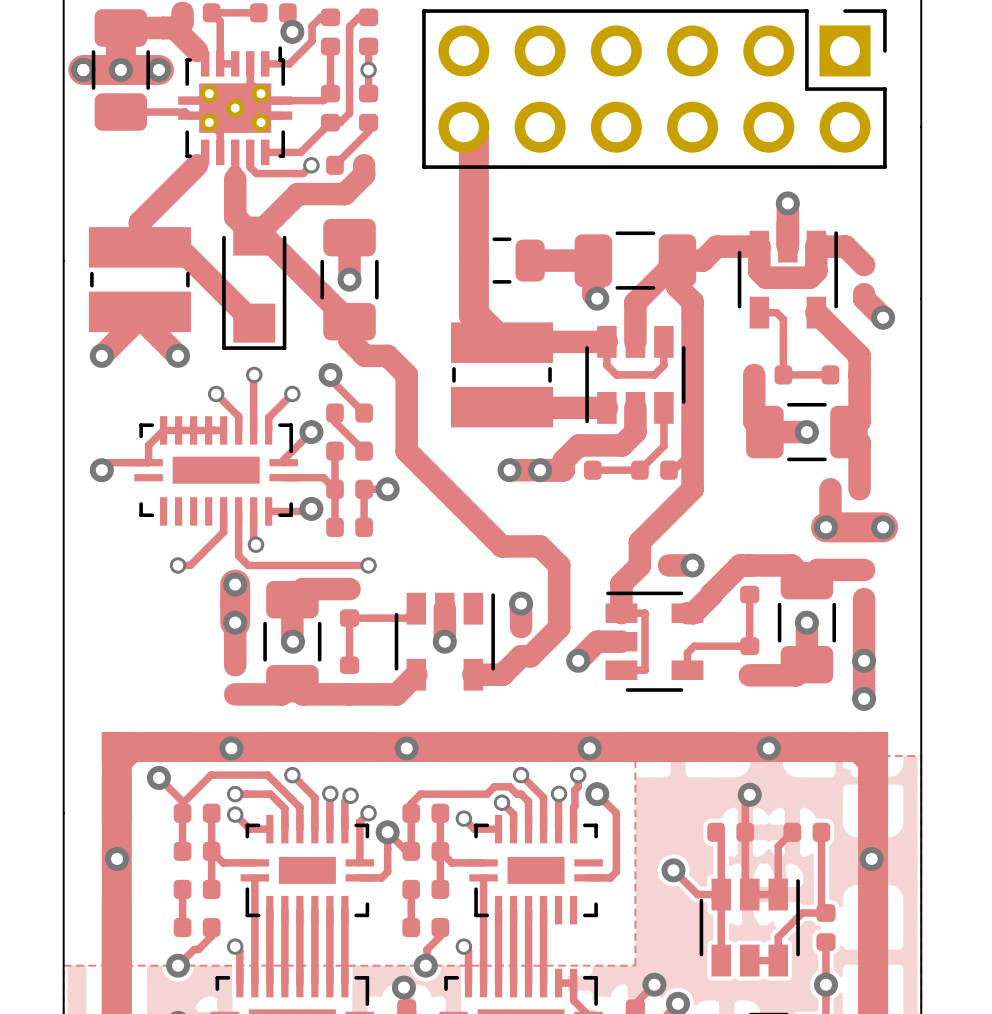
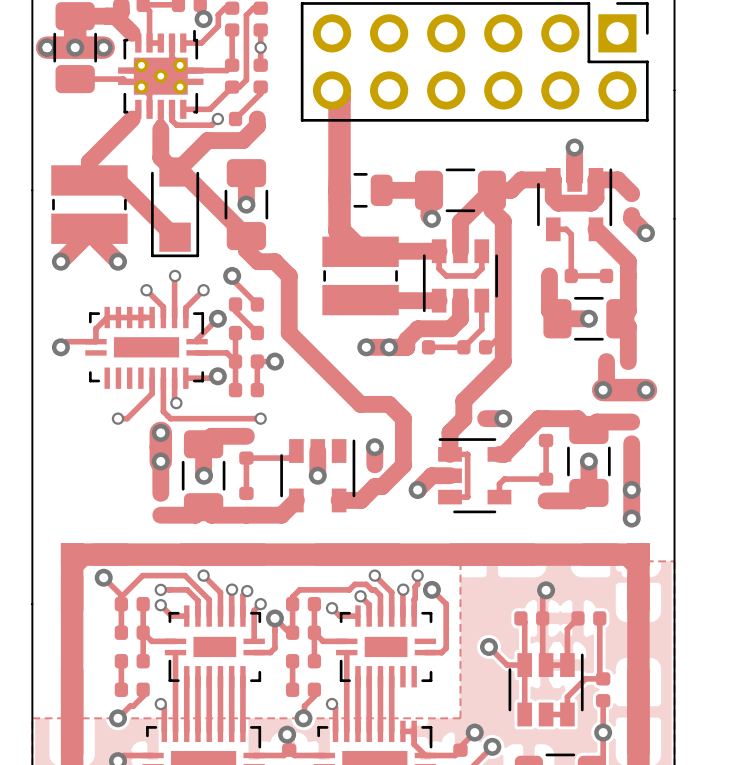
via: (231, 748) -> none
via: (406, 748) -> none
via: (589, 748) -> none
via: (768, 748) -> none
via: (117, 858) -> none
via: (871, 858) -> none

